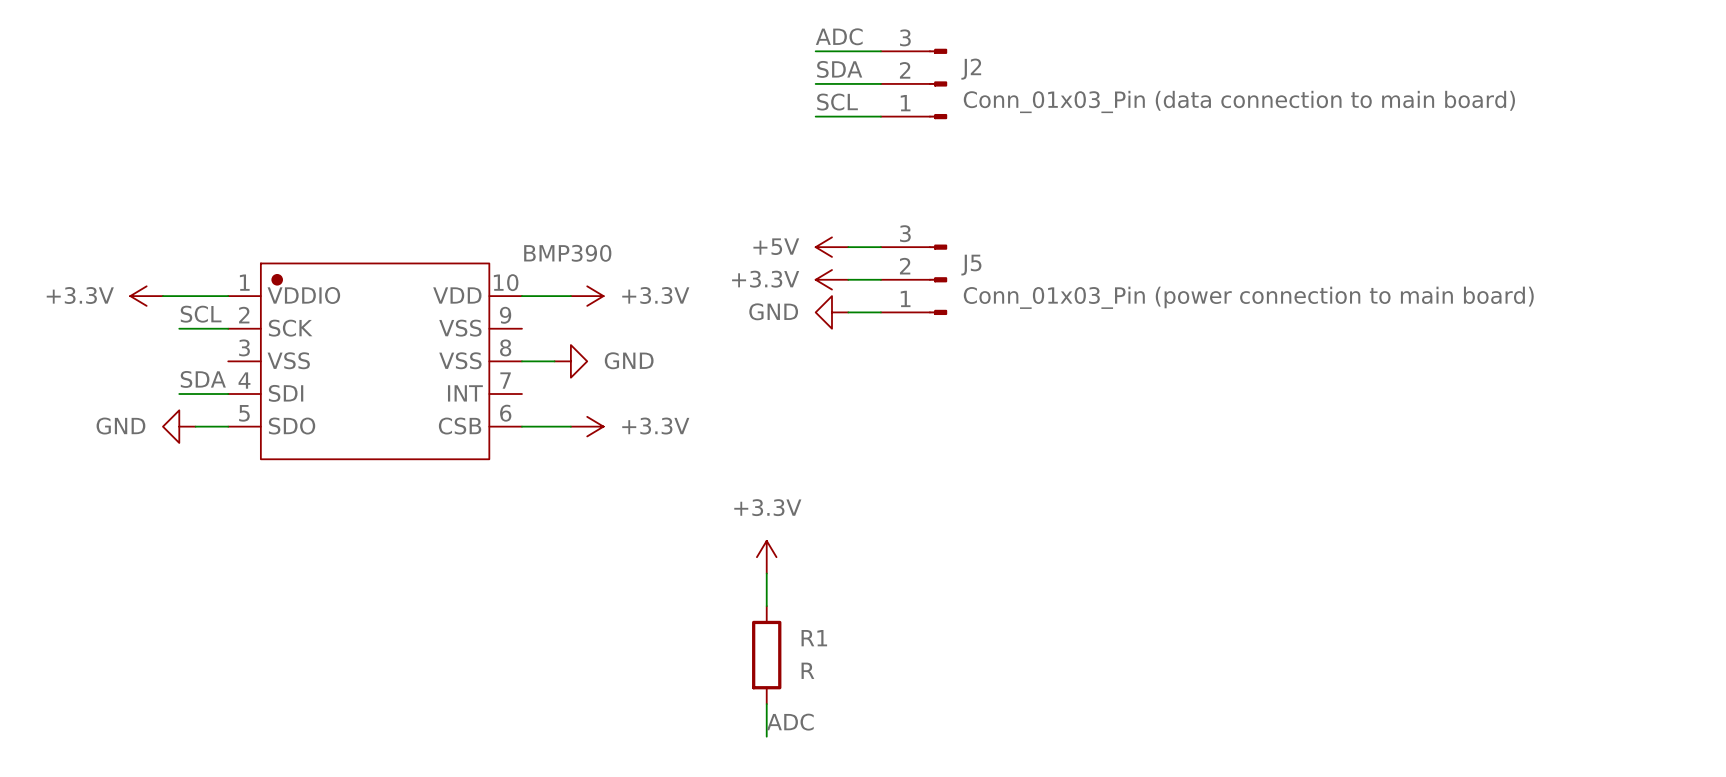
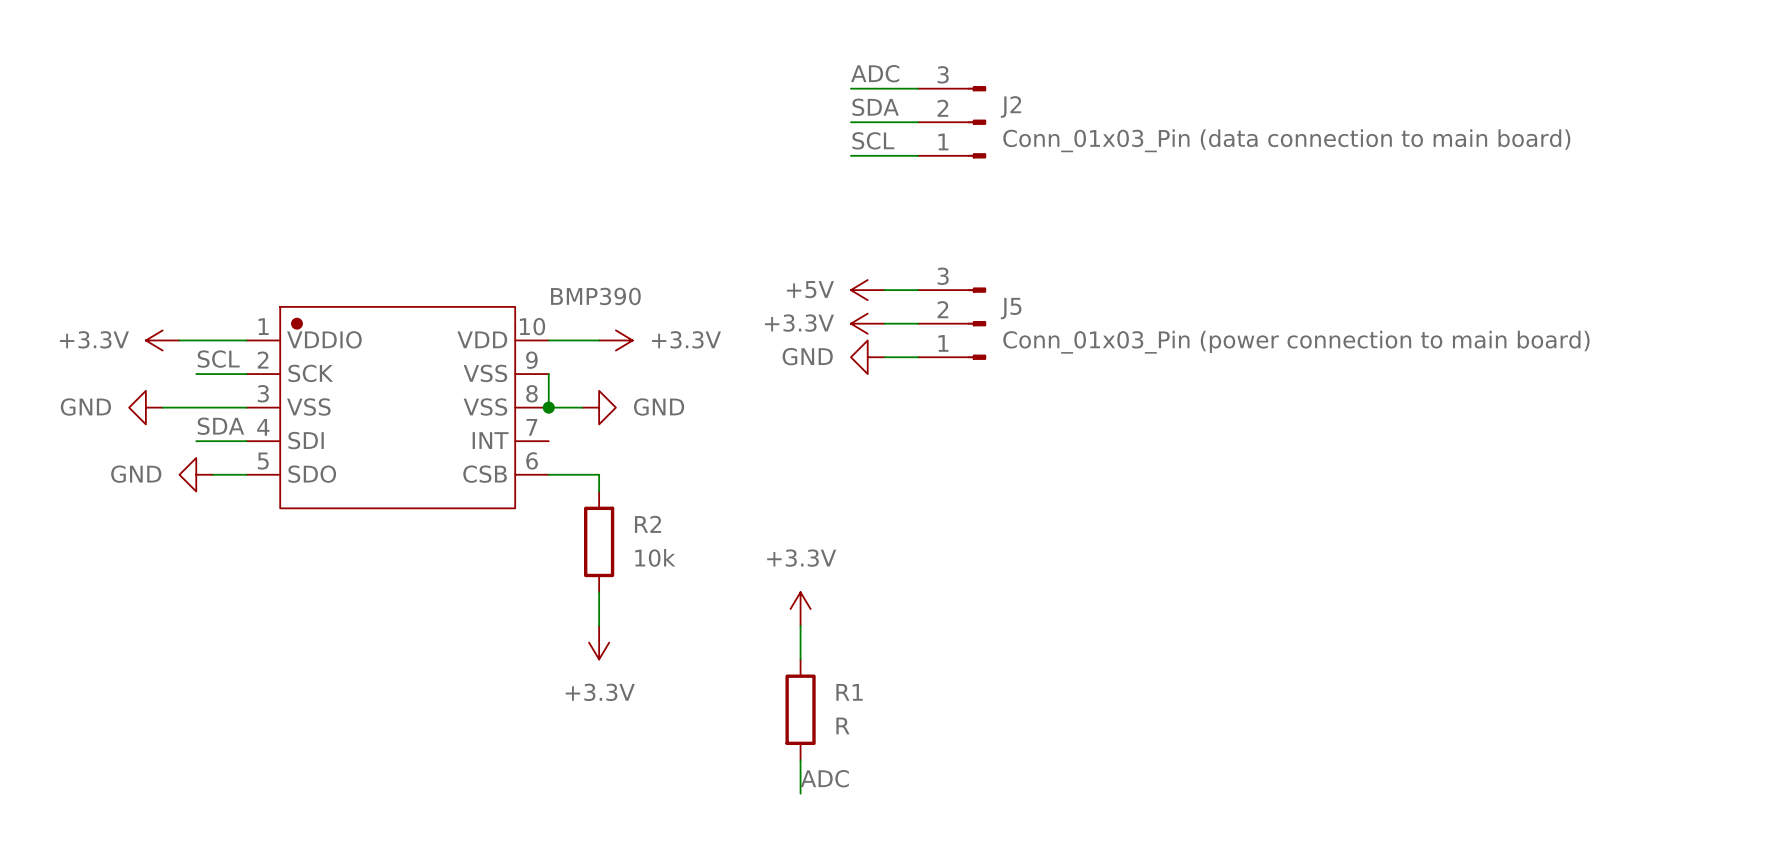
wire: none -> (548, 374) (548, 407)
power symbol: none -> GND (145, 407)
wire: none -> (162, 407) (246, 407)
junction: none -> (548, 407)
wire: none -> (599, 474) (599, 491)
power symbol rotation: 0° (587, 426) -> 90° clockwise (599, 642)
power symbol position: +3.3V (587, 426) -> +3.3V (599, 642)
power symbol text position: +3.3V (655, 426) -> +3.3V (600, 692)
R2: none -> 10k (599, 541)
wire: none -> (599, 592) (599, 625)

